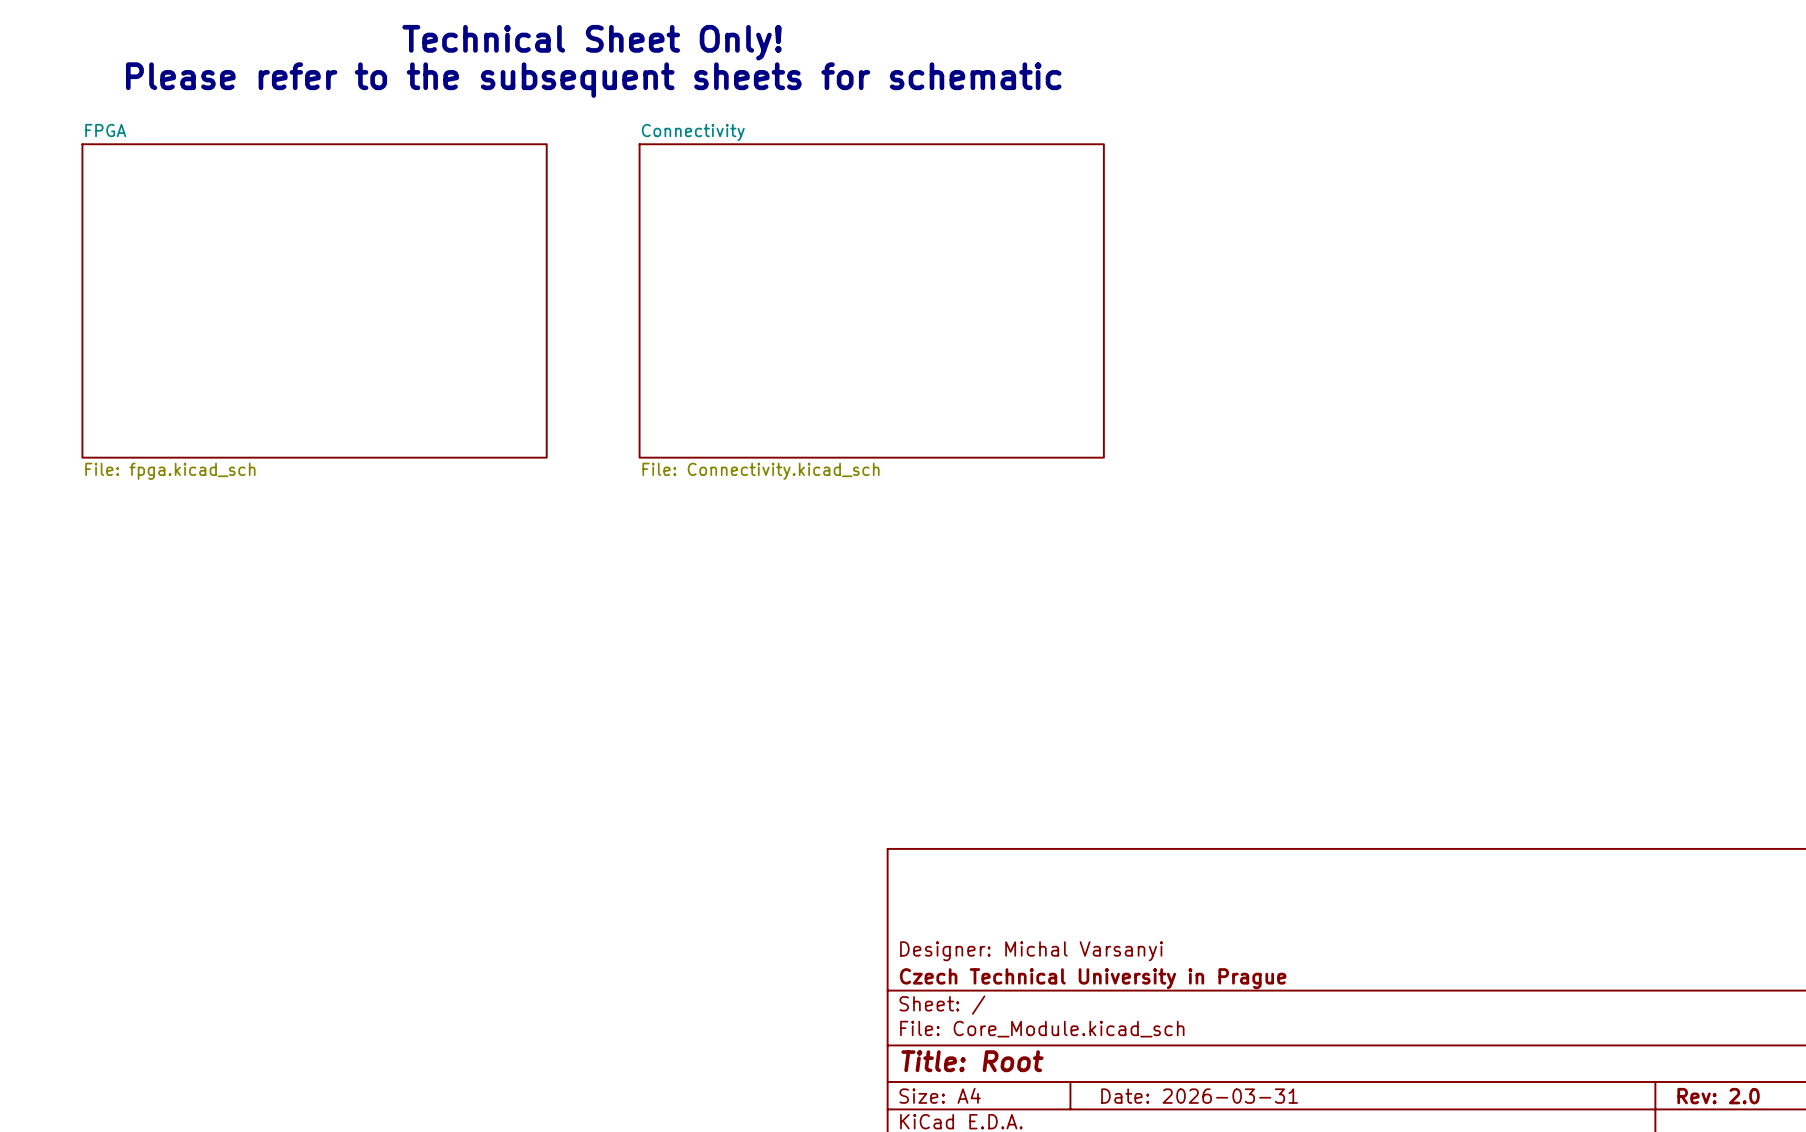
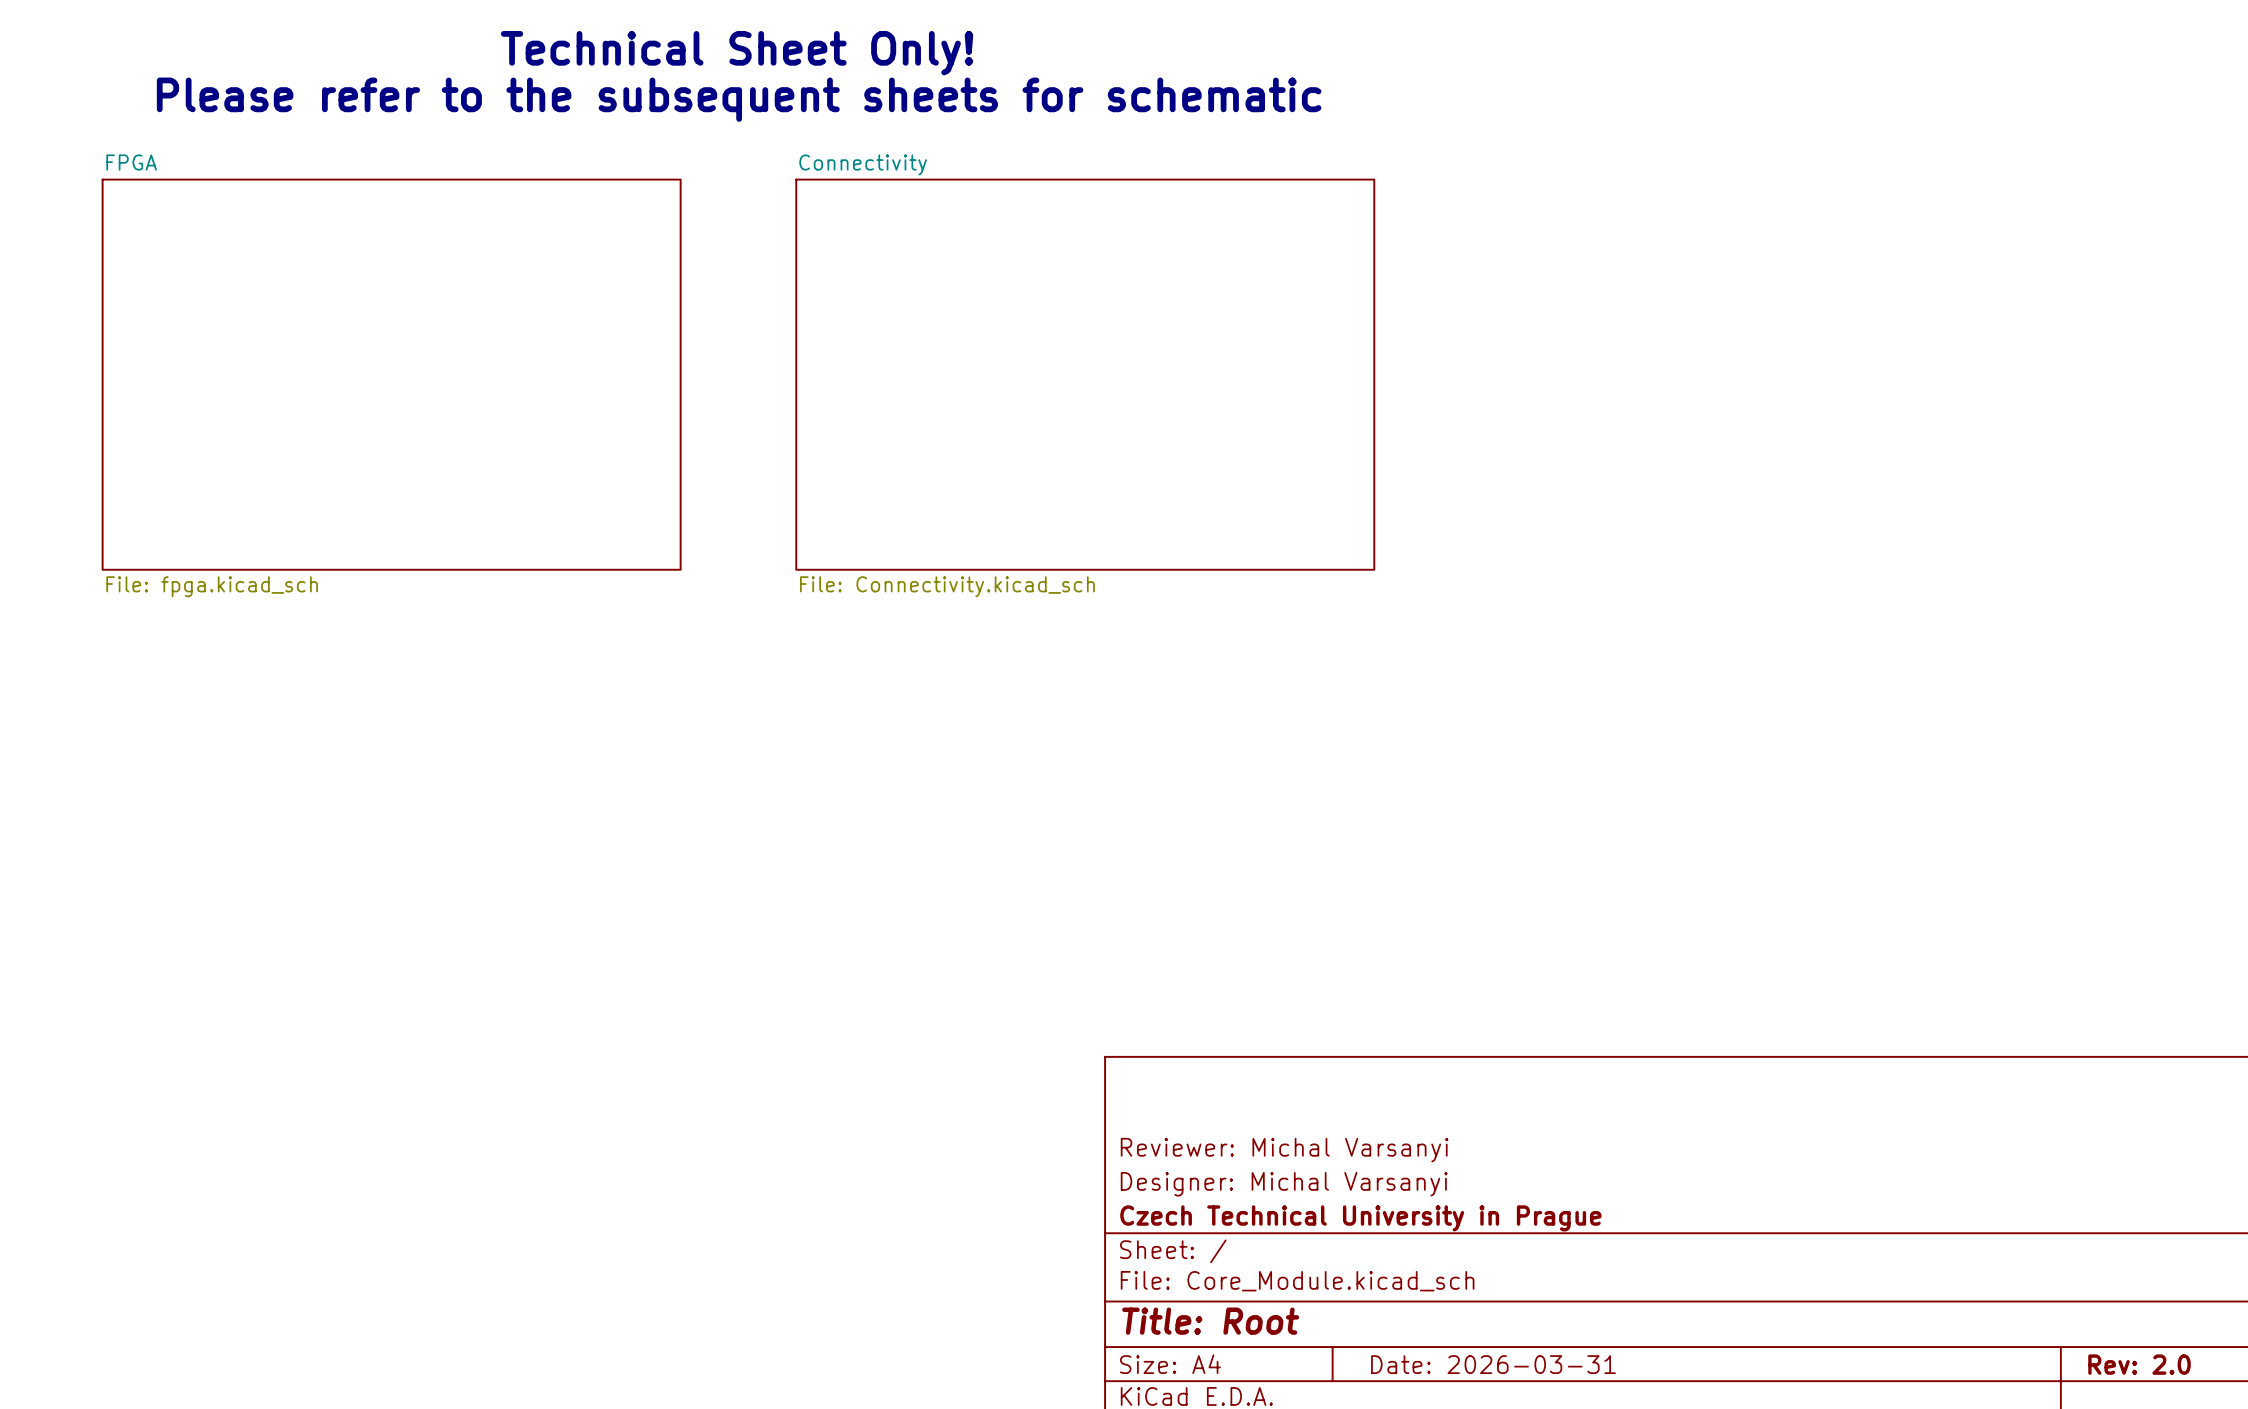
title block: none -> Reviewer: Michal Varsanyi (1284, 1150)

